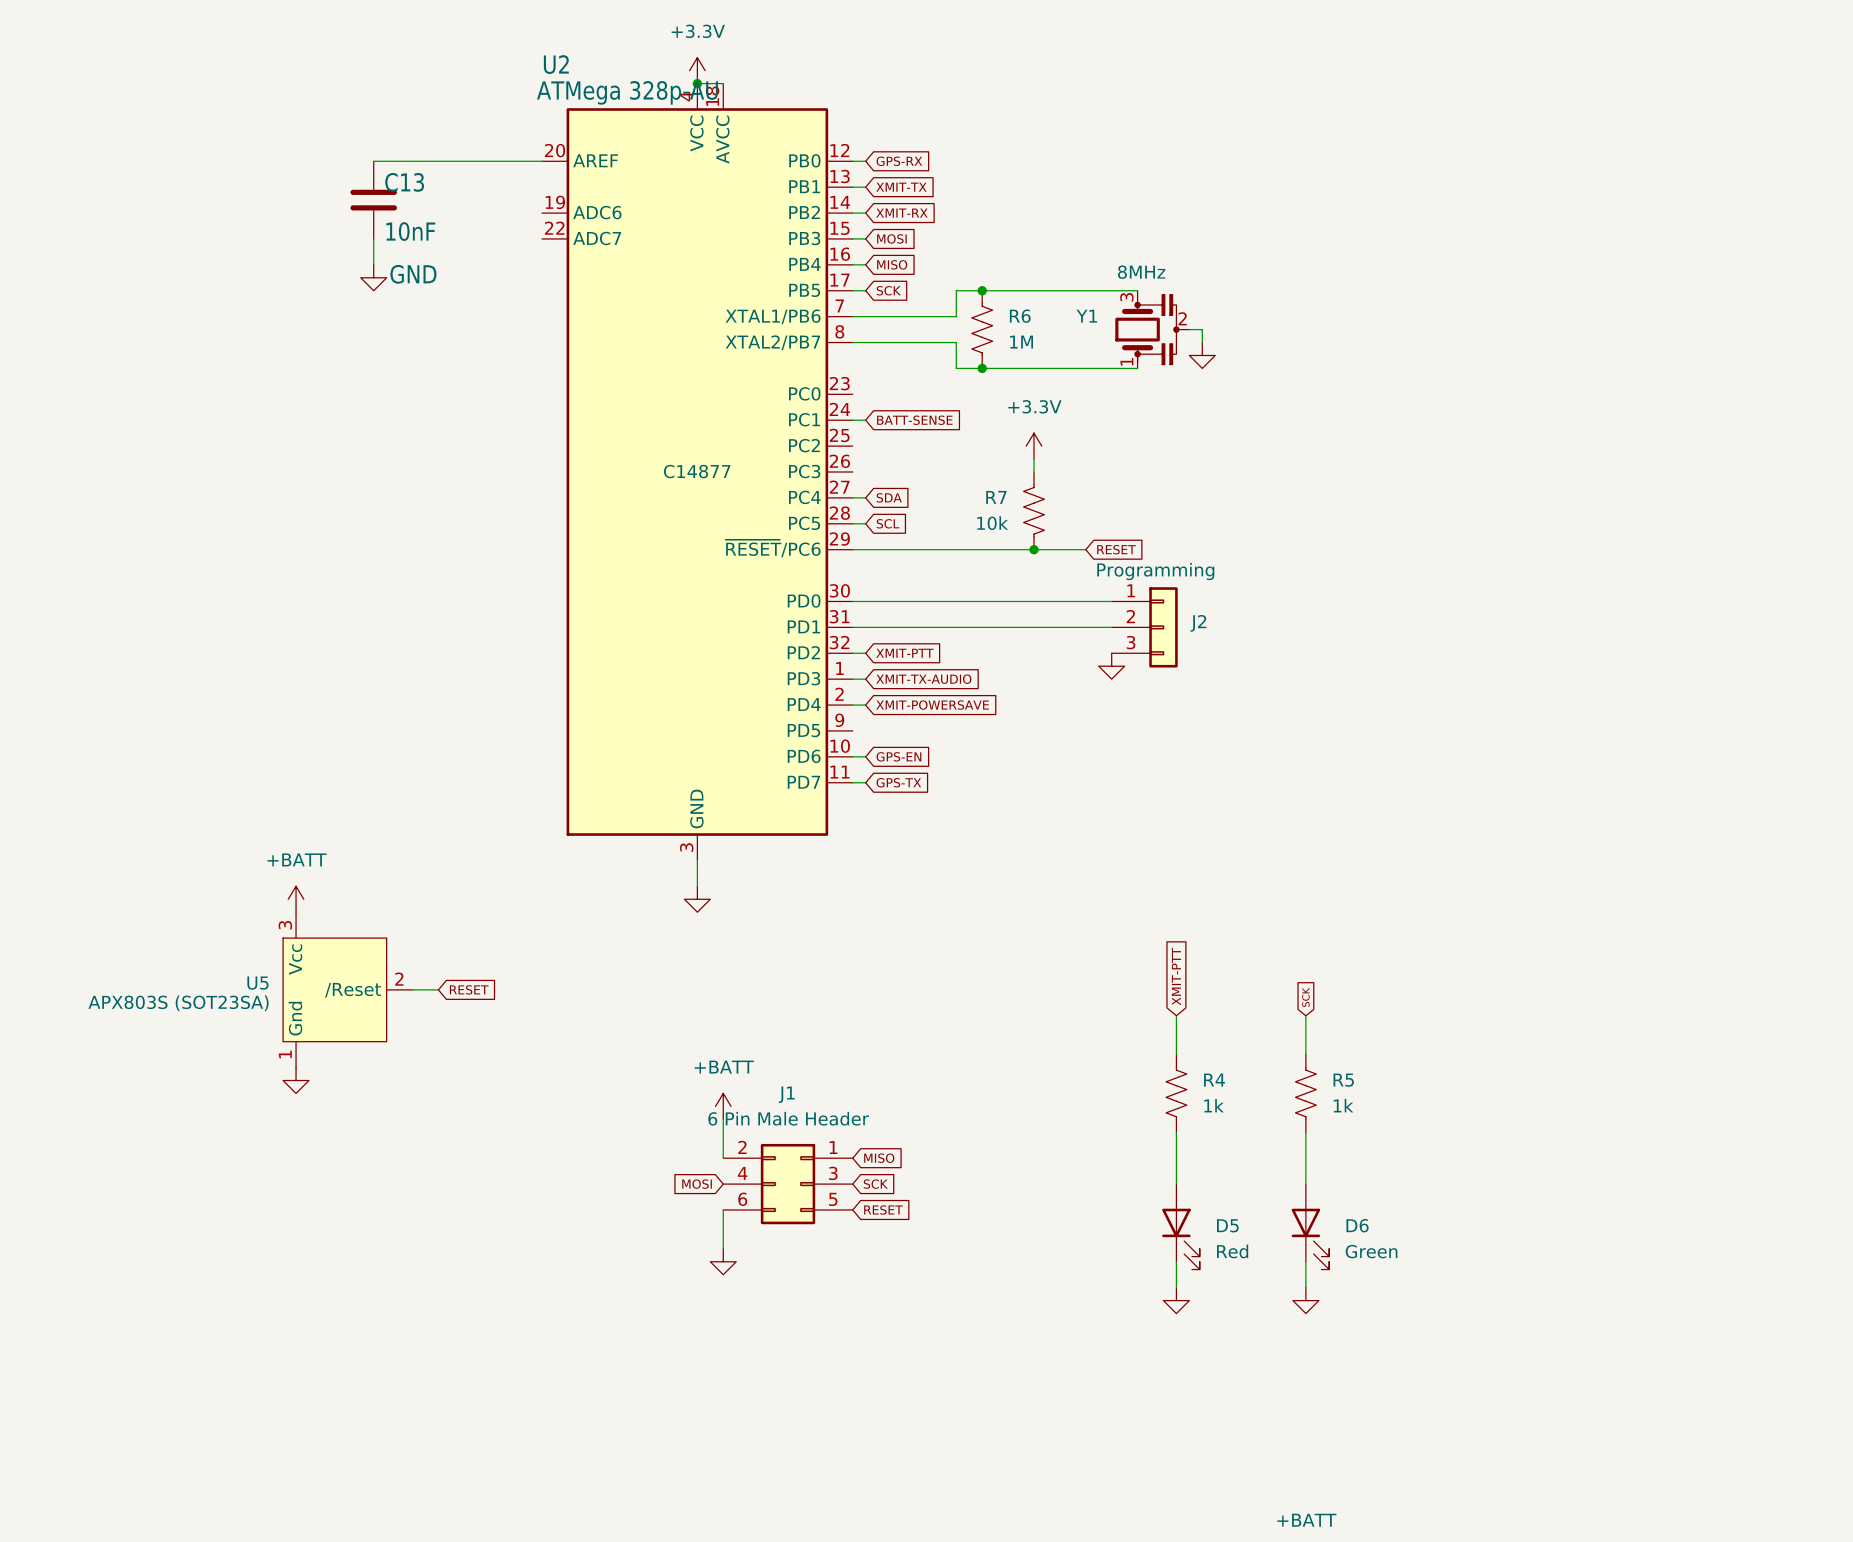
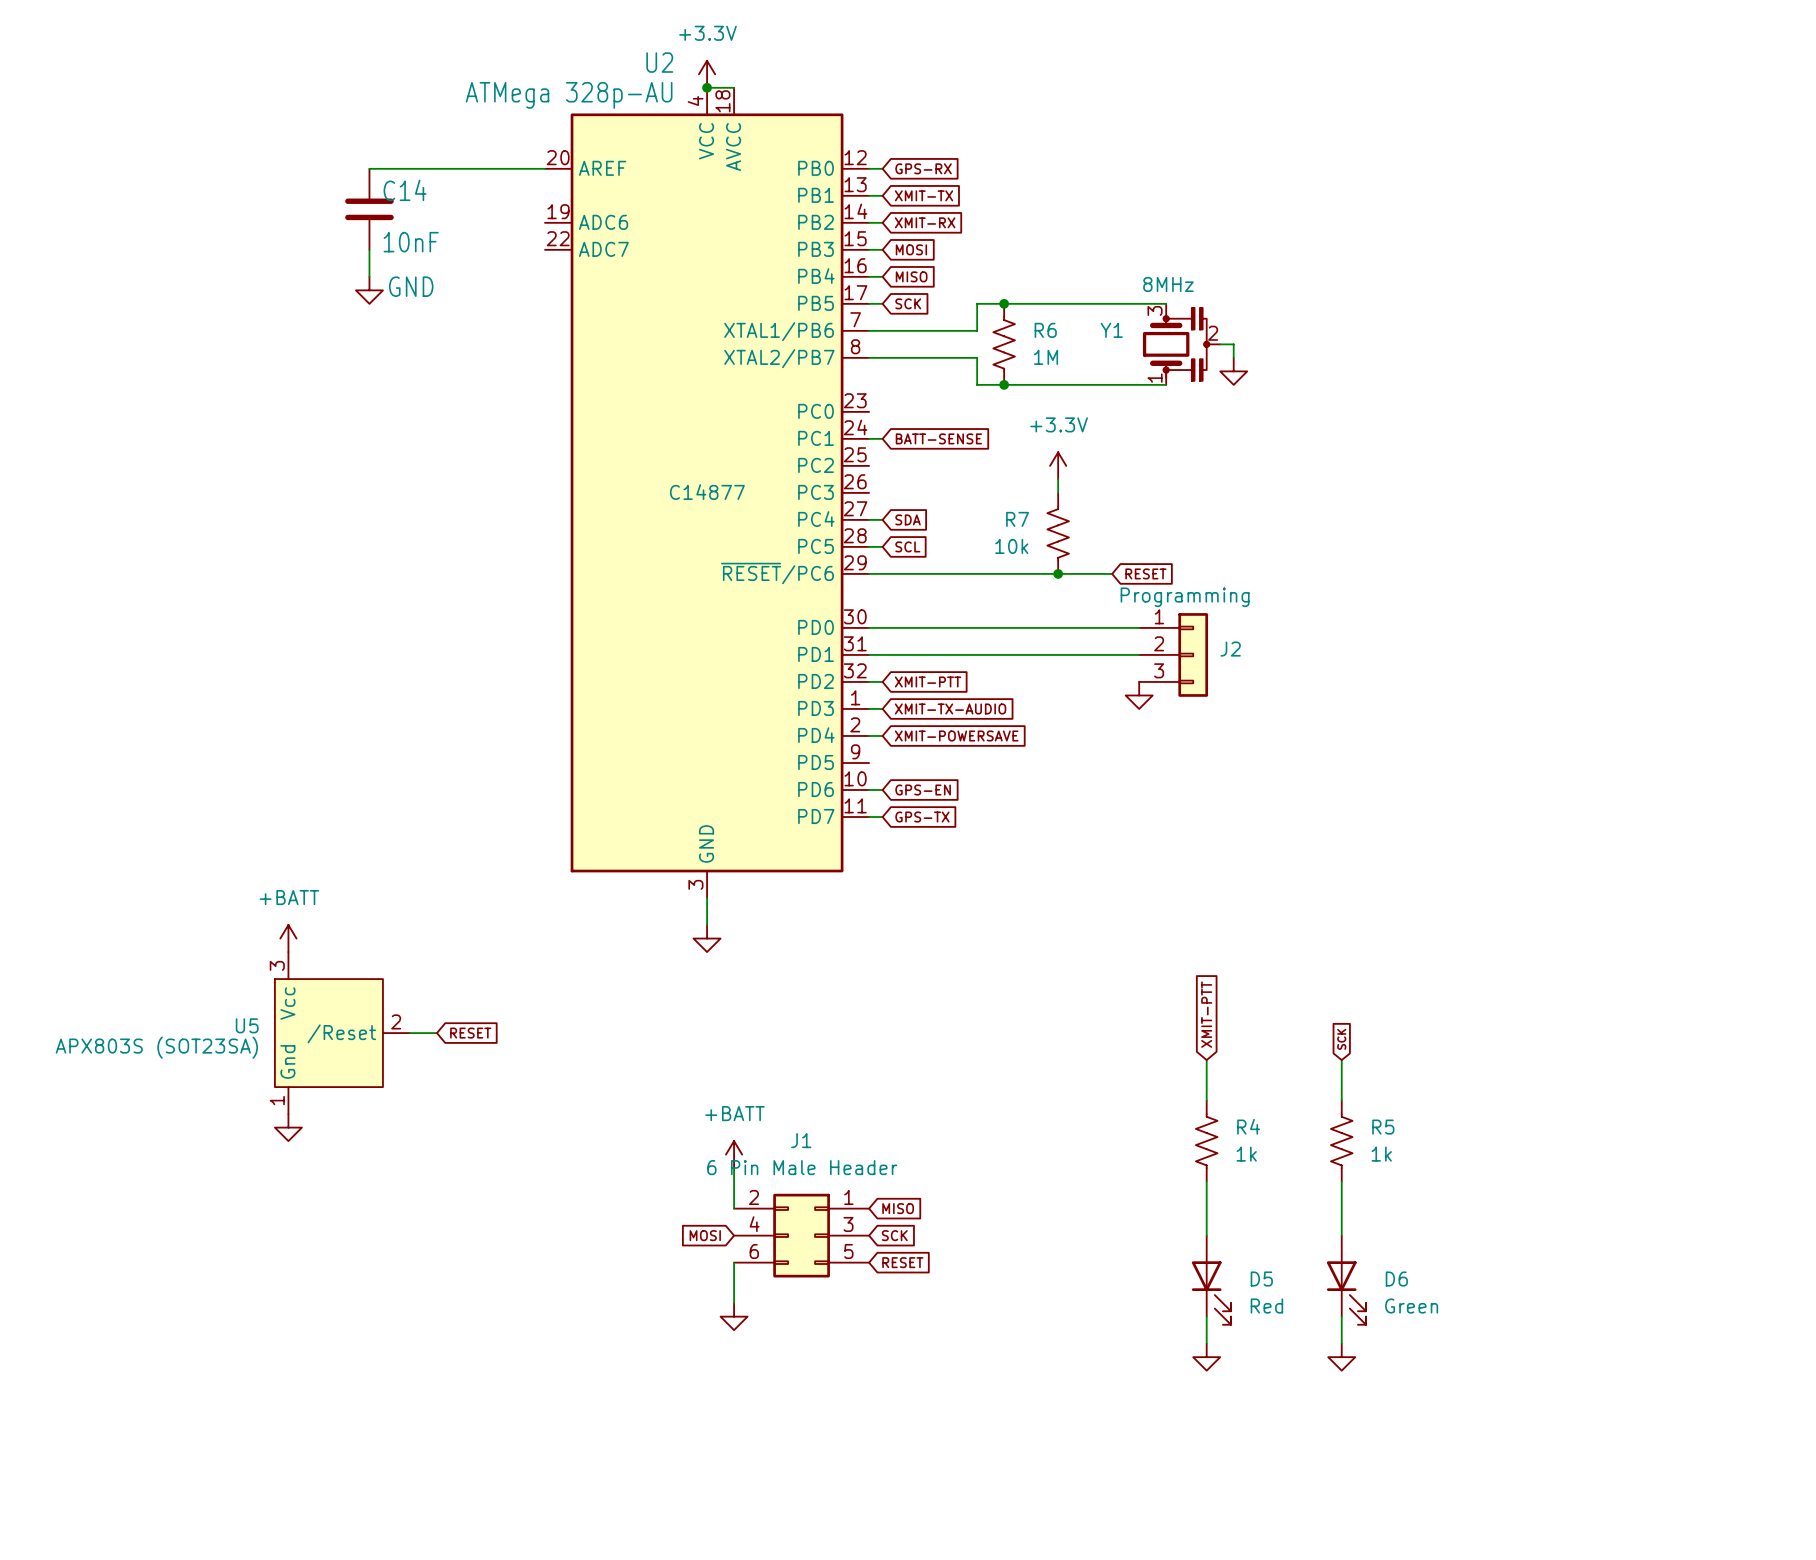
U2 name position: U2 (556, 64) -> U2 (659, 62)
U2 value position: ATMega 328p-AU (627, 92) -> ATMega 328p-AU (569, 95)
C13 name: C13 (404, 182) -> C14 (405, 190)

